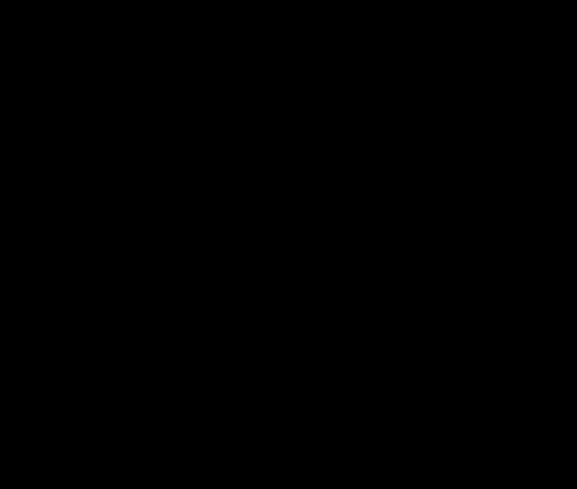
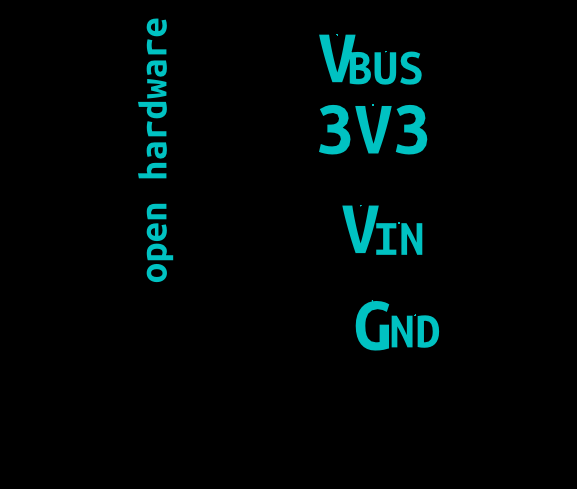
drawing: none -> [138, 18, 174, 283]
part: none -> (337, 58)
part: none -> (385, 68)
part: none -> (373, 129)
part: none -> (360, 229)
part: none -> (399, 239)
part: none -> (372, 325)
part: none -> (415, 331)

